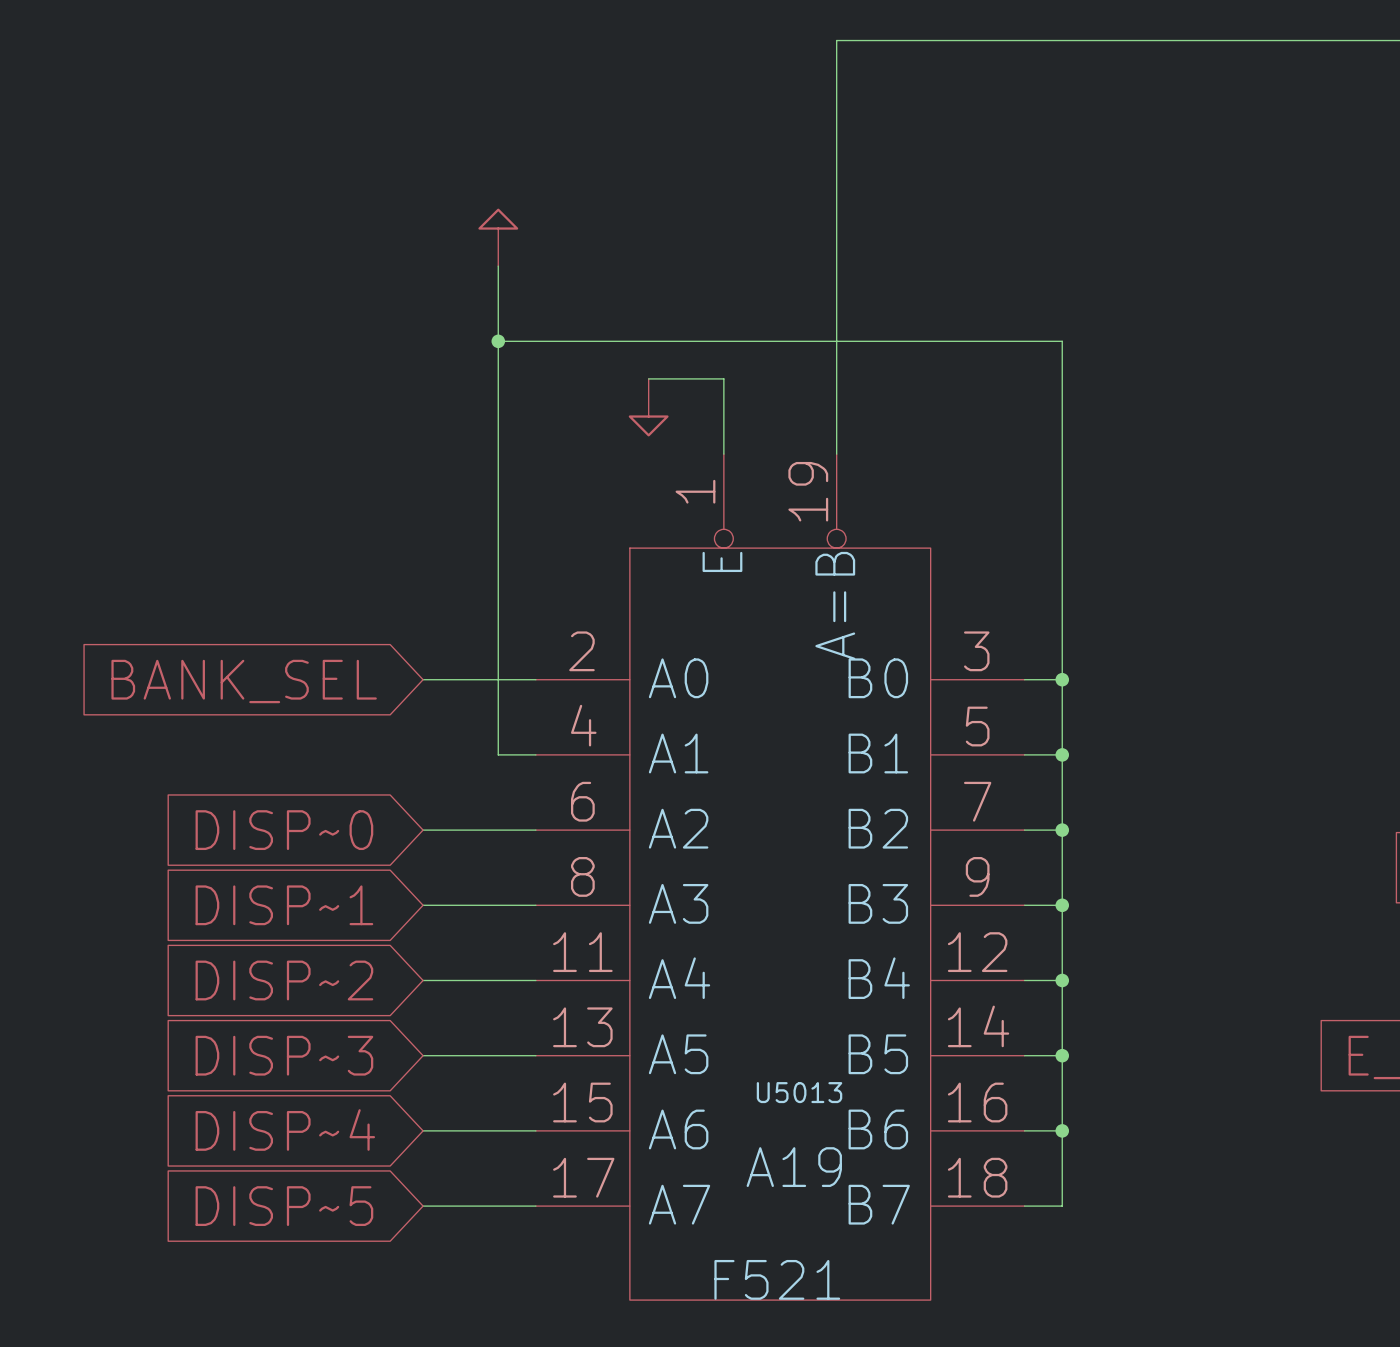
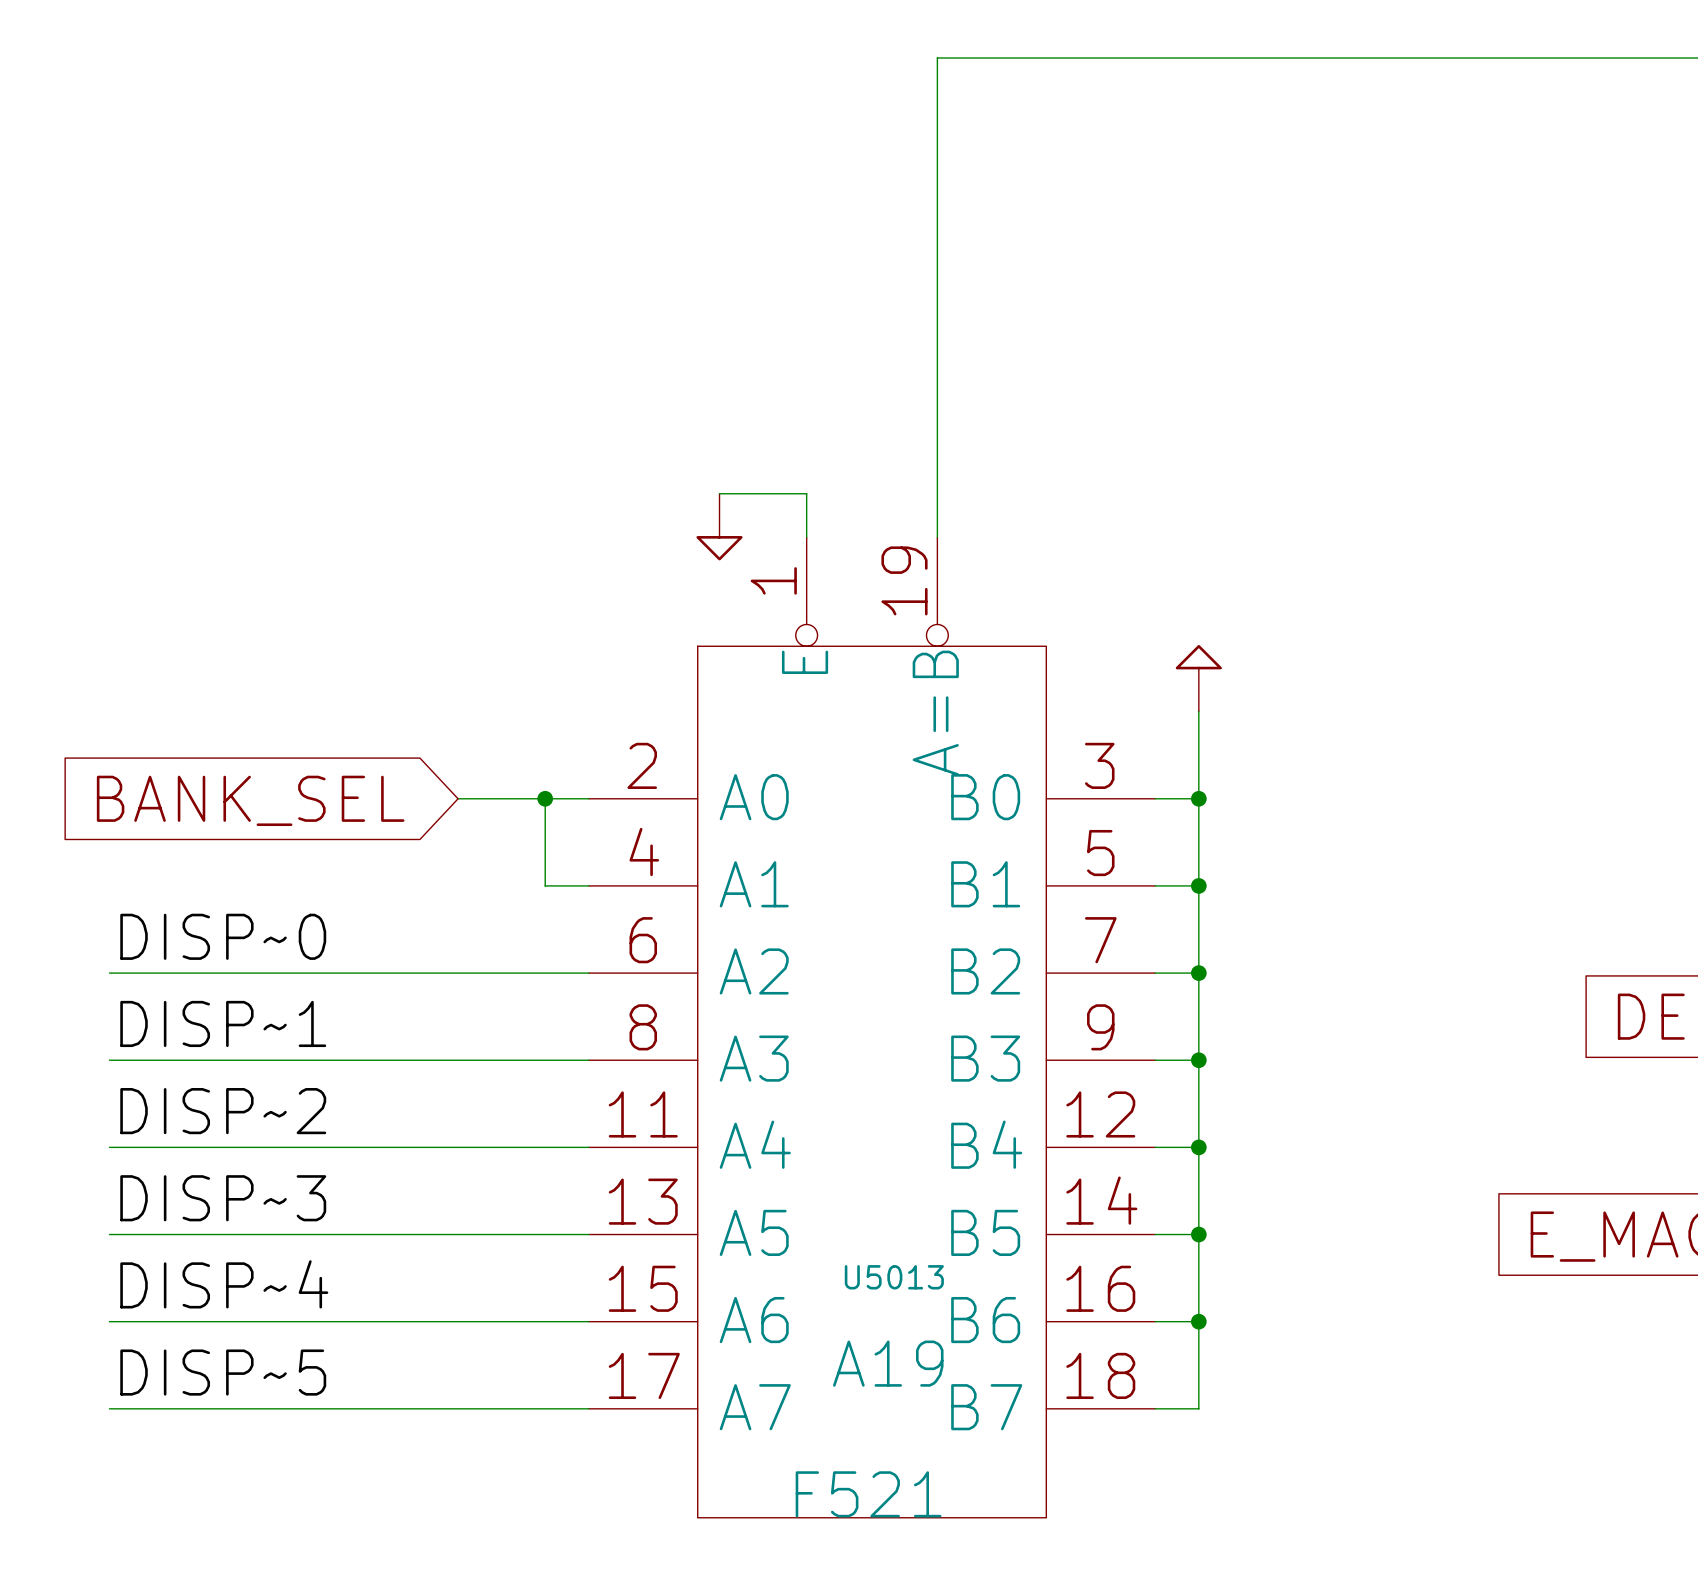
power symbol: (498, 237) -> none
wire: (498, 266) (498, 679) -> none
wire: (498, 341) (1062, 341) (1062, 604) -> none
junction: (498, 341) -> none
wire: (648, 378) (723, 378) (723, 416) -> (719, 493) (806, 493)
power symbol position: (648, 407) -> (719, 527)
power symbol: none -> (1198, 678)
junction: none -> (545, 798)
label: none -> DISP~0 (223, 936)
wire: none -> (109, 973) (458, 973)
global label: DISP~0 (284, 830) -> none
label: none -> DISP~1 (223, 1023)
wire: none -> (109, 1060) (458, 1060)
global label: DISP~1 (284, 905) -> none
label: none -> DISP~2 (223, 1111)
wire: none -> (109, 1147) (458, 1147)
global label: DISP~2 (284, 980) -> none
label: none -> DISP~3 (223, 1198)
wire: none -> (109, 1234) (458, 1234)
global label: DISP~3 (284, 1055) -> none
label: none -> DISP~4 (224, 1284)
global label: DISP~4 (285, 1129) -> none
wire: none -> (109, 1321) (458, 1321)
label: none -> DISP~5 (223, 1372)
wire: none -> (109, 1408) (458, 1408)
global label: DISP~5 (284, 1206) -> none

